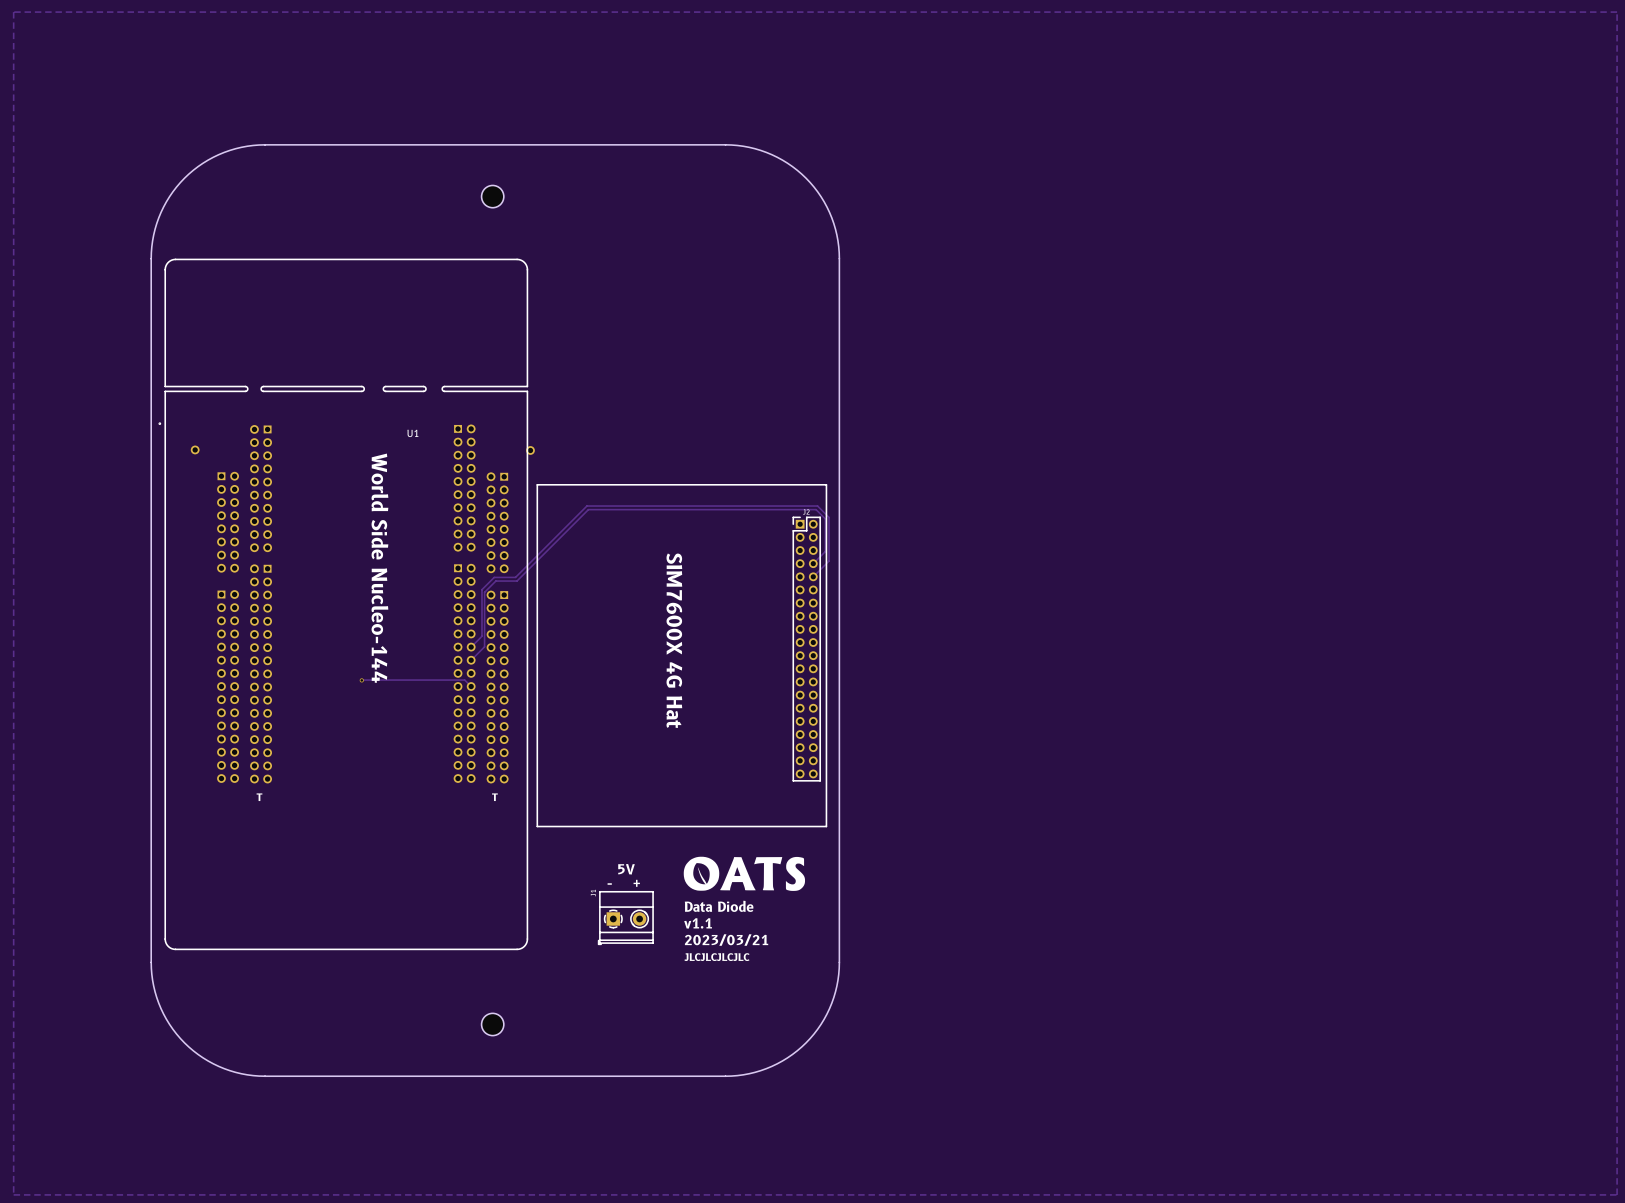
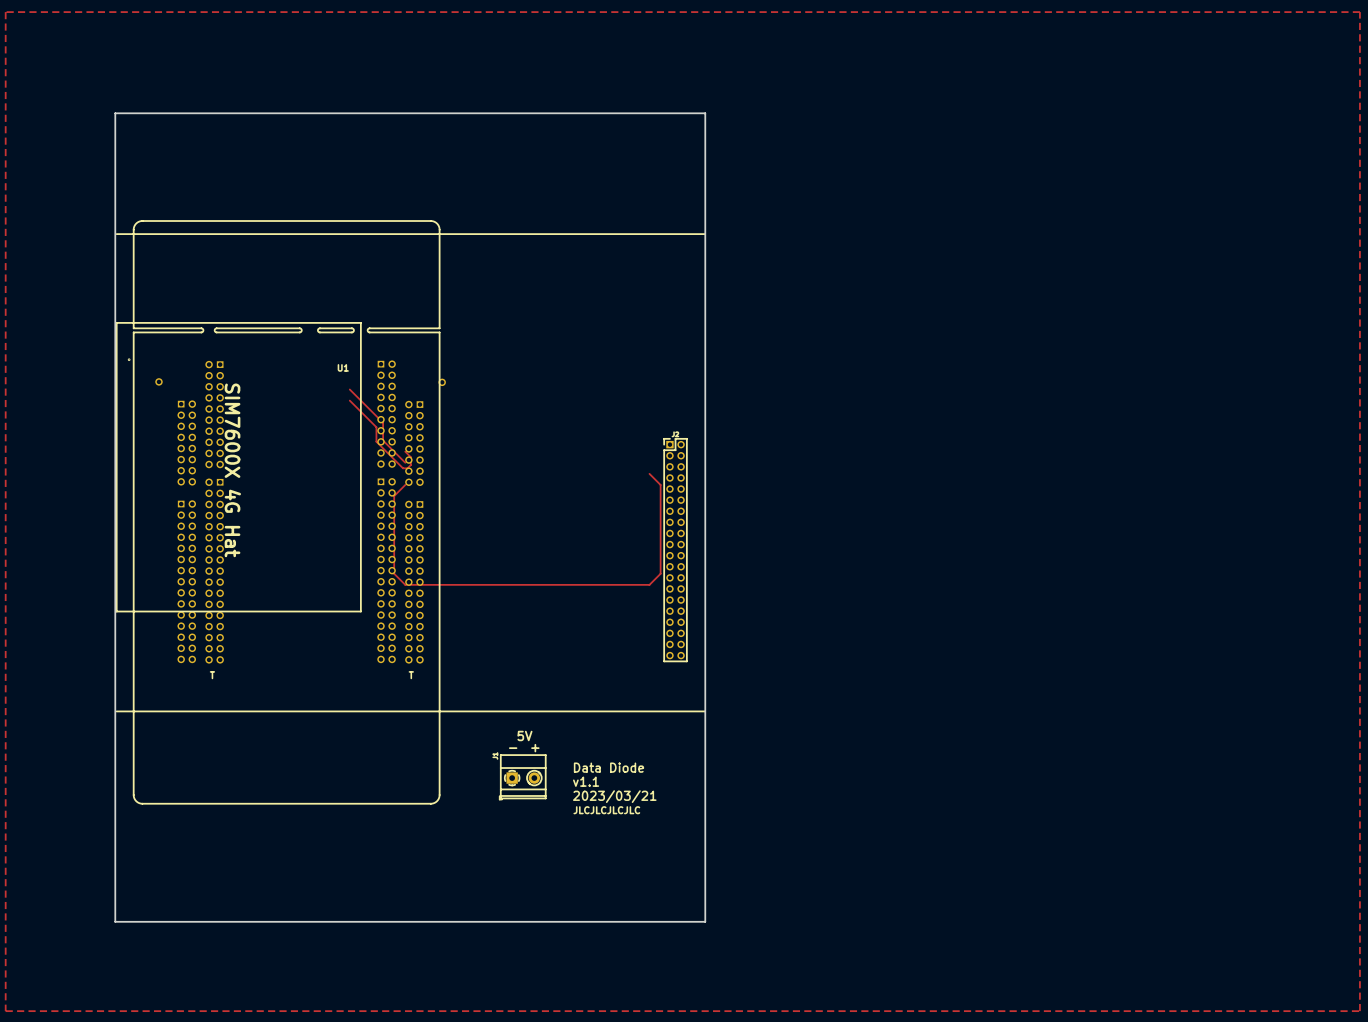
board edge: (265, 144) (737, 145) (766, 152) (787, 163) (810, 182) (824, 201) (835, 229) (839, 258) (839, 968) (833, 997) (821, 1024) (806, 1042) (782, 1060) (755, 1072) (731, 1076) (259, 1076) (229, 1070) (203, 1057) (184, 1042) (166, 1019) (155, 991) (151, 962) (151, 246) (155, 229) (163, 207) (172, 191) (188, 174) (208, 160) (224, 152) (241, 147) (265, 144) -> (115, 113) (115, 921) (705, 921) (705, 113) (115, 113)
part: (492, 196) -> none
line: none -> (116, 234) (705, 234)
line: none -> (116, 322) (360, 322) (360, 611) (116, 611) (116, 322)
track: none -> (349, 389) (383, 422) (383, 440) (405, 462)
track: none -> (349, 400) (376, 427) (376, 441) (403, 468) (407, 468) (410, 465) (410, 457) (405, 451)
line: (537, 484) (826, 484) (826, 826) (537, 826) (537, 484) -> none
text: none -> SIM7600X 4G Hat (232, 470)
track: none -> (649, 473) (660, 484) (660, 573) (649, 584) (405, 584) (394, 573) (394, 496) (405, 484)
track: (813, 563) (825, 551) (825, 518) (816, 509) (588, 509) (517, 581) (495, 581) -> none
text: World Side Nucleo-144 (379, 568) -> none
track: (813, 576) (829, 561) (829, 517) (817, 506) (586, 506) (515, 577) (494, 577) (481, 589) (481, 636) (471, 647) -> none
track: (495, 581) (484, 592) (484, 646) (471, 660) -> none
text: SIM7600X 4G Hat (674, 640) -> none
track: (361, 680) (464, 680) (471, 686) -> none
via: (361, 680) -> none
line: none -> (116, 711) (705, 711)
drawing: [683, 856, 806, 891] -> none
part: (492, 1024) -> none

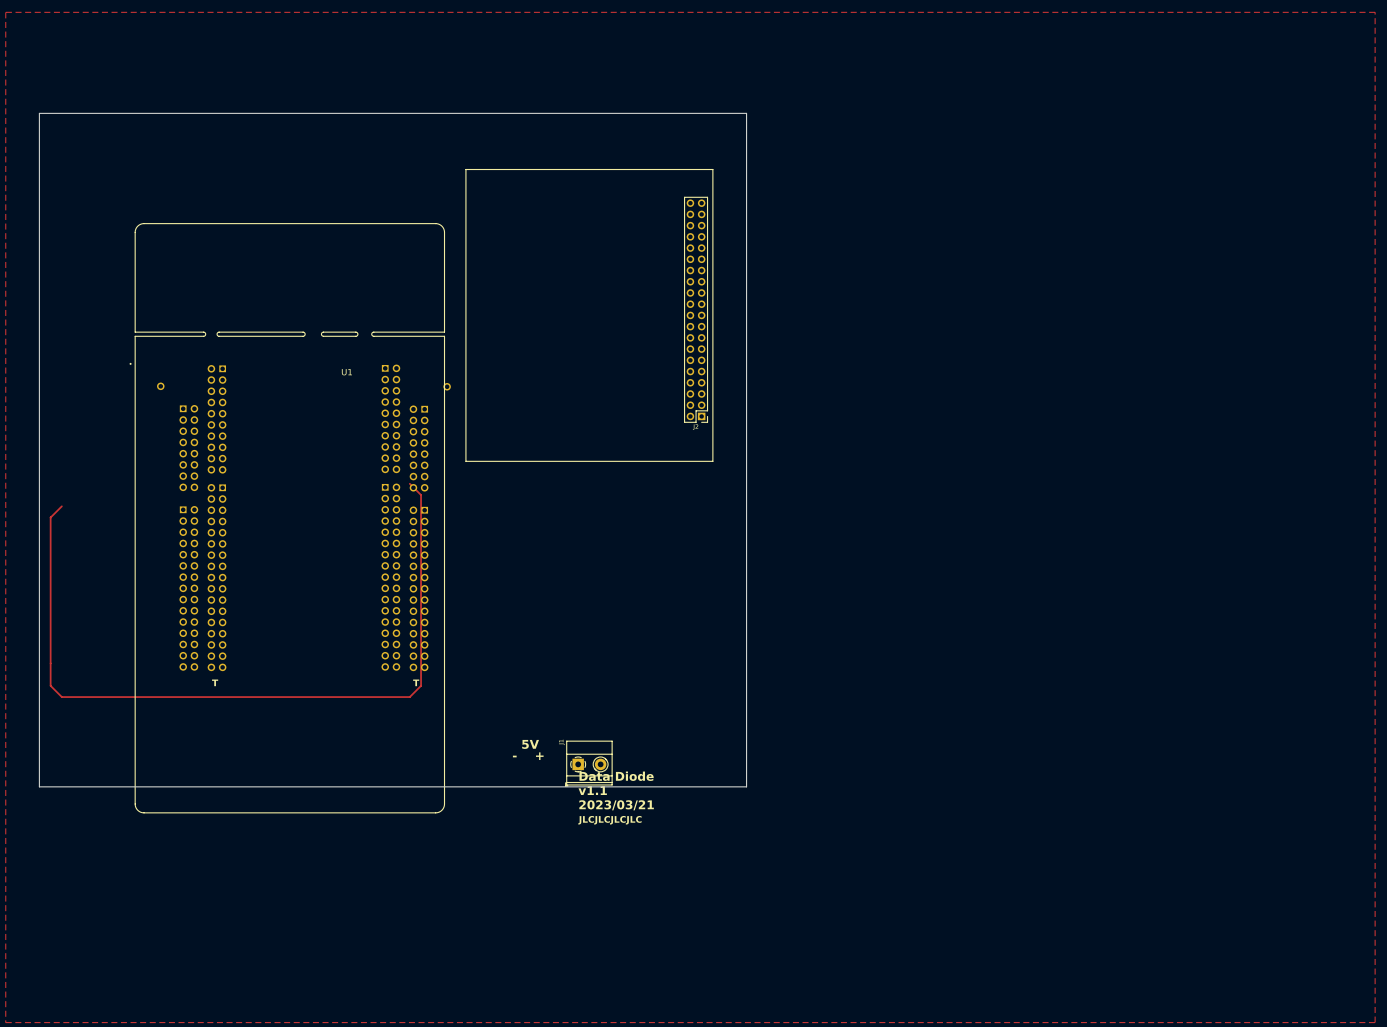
board edge: (115, 113) (705, 113) (705, 921) (115, 921) (115, 113) -> (39, 113) (39, 786) (746, 786) (746, 113) (39, 113)
line: none -> (465, 169) (712, 169) (712, 461) (465, 461) (465, 169)
line: (116, 234) (705, 234) -> none
line: (116, 322) (360, 322) (360, 611) (116, 611) (116, 322) -> none
track: (349, 389) (383, 422) (383, 440) (405, 462) -> none
track: (349, 400) (376, 427) (376, 441) (403, 468) (407, 468) (410, 465) (410, 457) (405, 451) -> none
text: SIM7600X 4G Hat (232, 470) -> none
track: (649, 473) (660, 484) (660, 573) (649, 584) (405, 584) (394, 573) (394, 496) (405, 484) -> none
track: none -> (409, 483) (421, 495) (421, 685) (409, 697) (61, 697) (50, 685) (50, 517)
track: none -> (61, 506) (50, 517)
part rotation: 0° (675, 550) -> 180° (696, 309)
part position: (675, 550) -> (696, 309)
line: (116, 711) (705, 711) -> none
part position: (522, 777) -> (588, 763)

